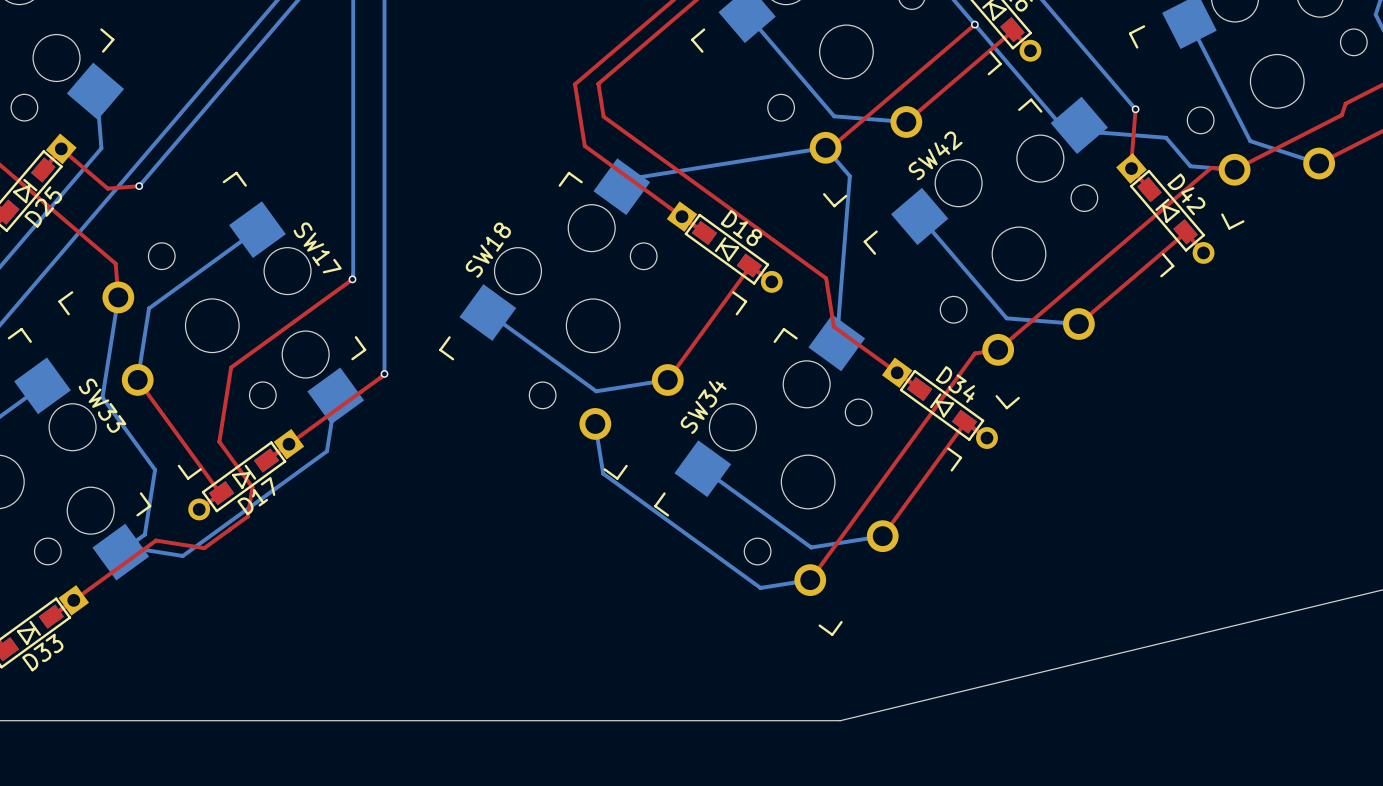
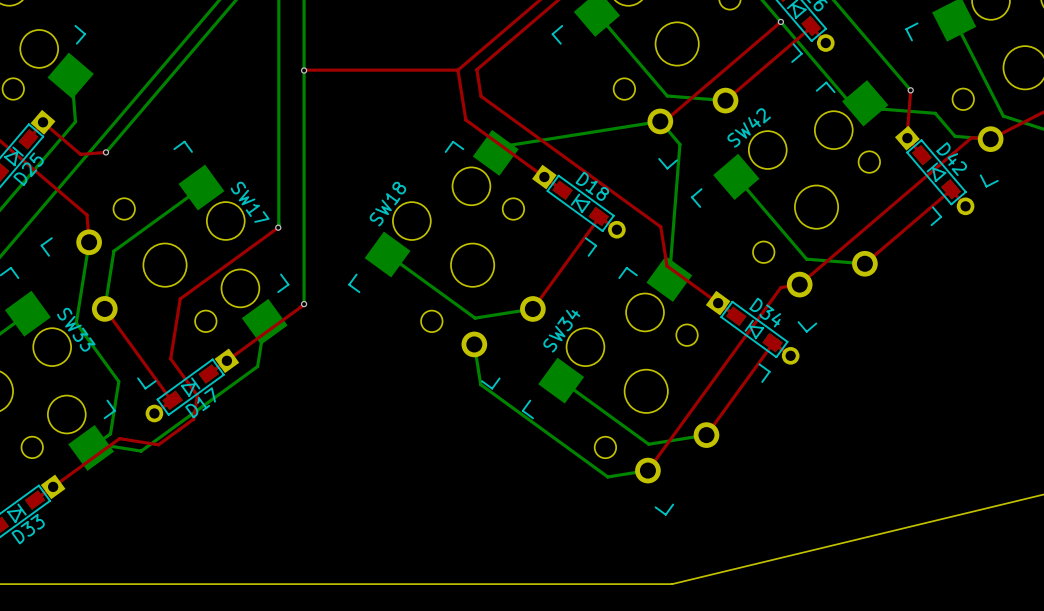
top track: none -> (304, 70) (457, 70)
via: none -> (304, 70)

